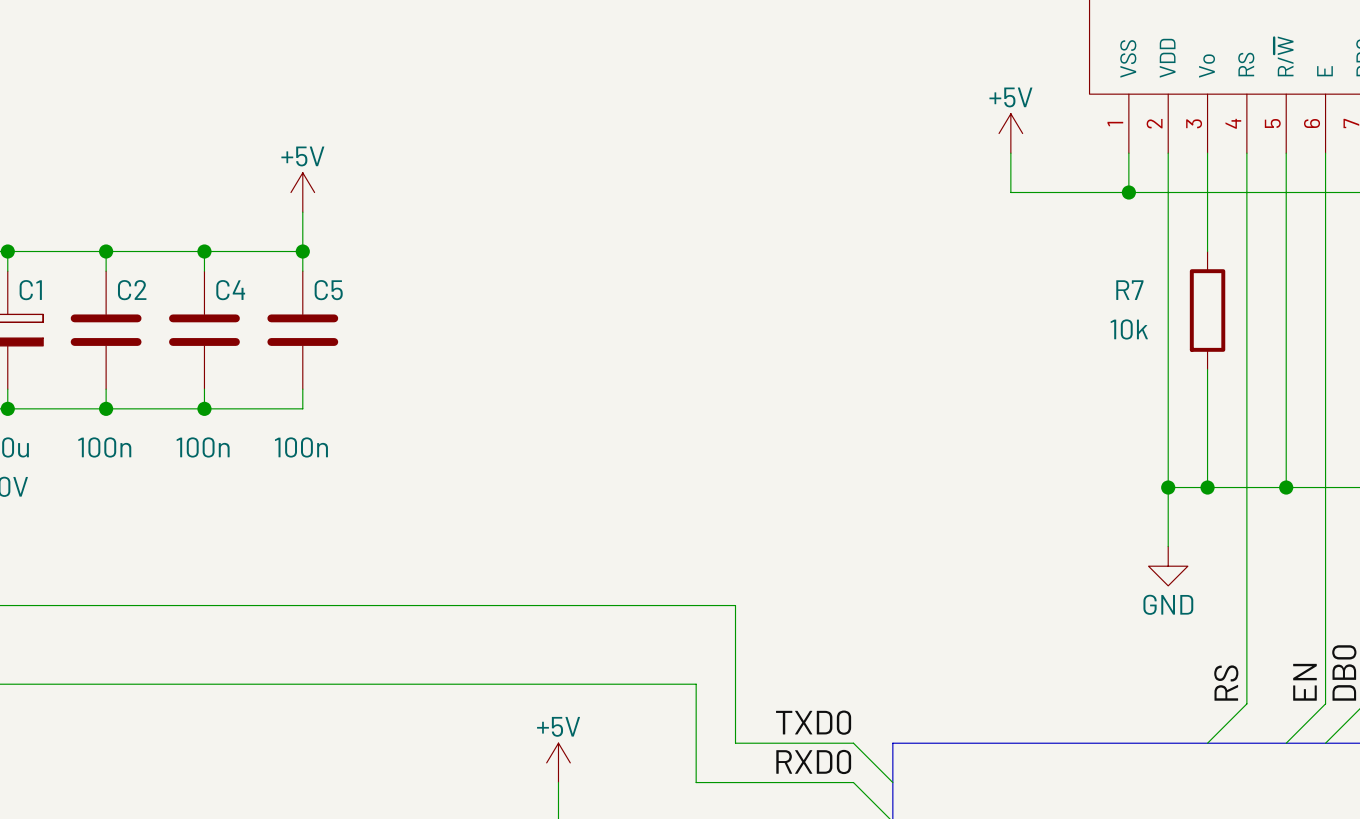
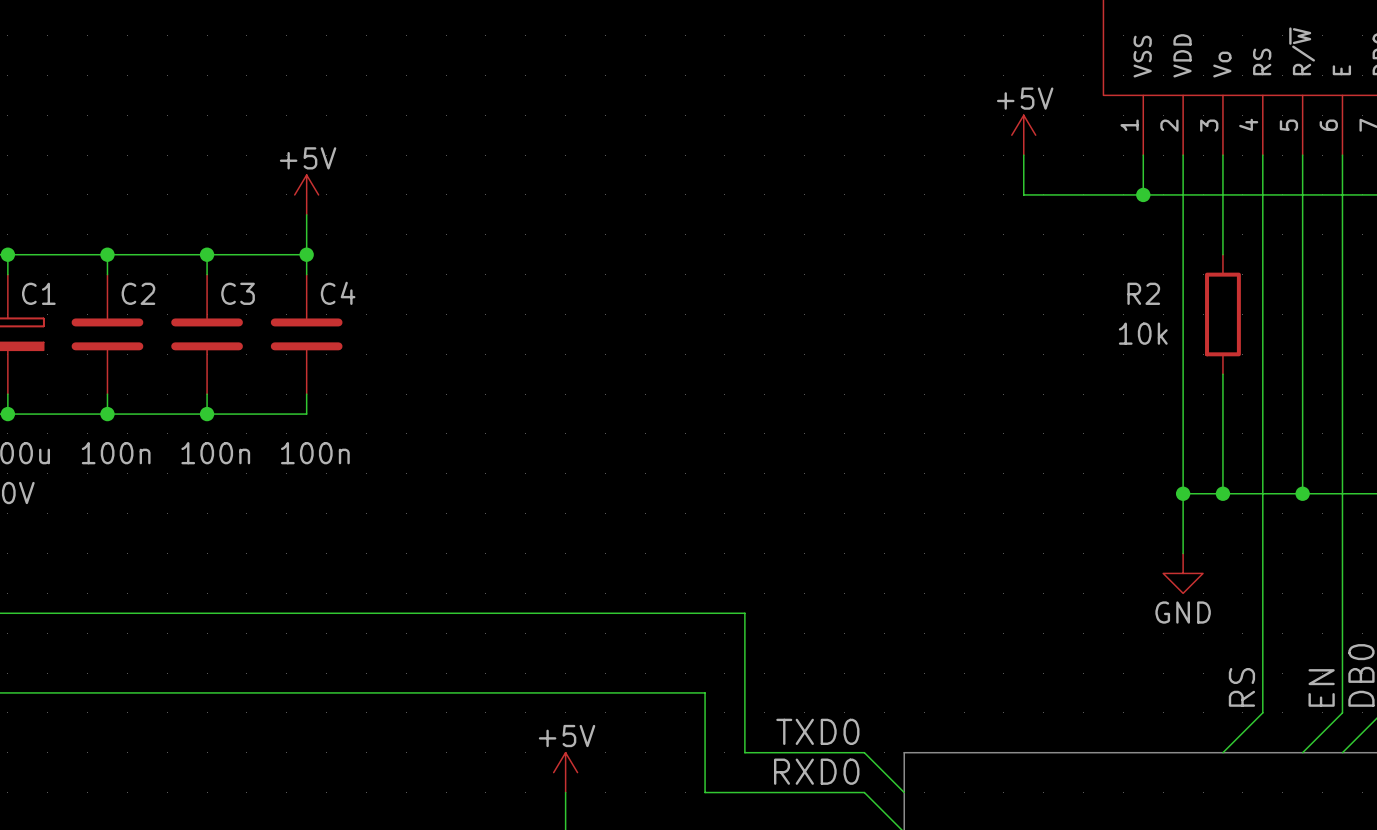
C4 name: C4 (230, 290) -> C3 (238, 293)
C5 name: C5 (328, 290) -> C4 (338, 293)
R7 name: R7 (1129, 290) -> R2 (1143, 293)

